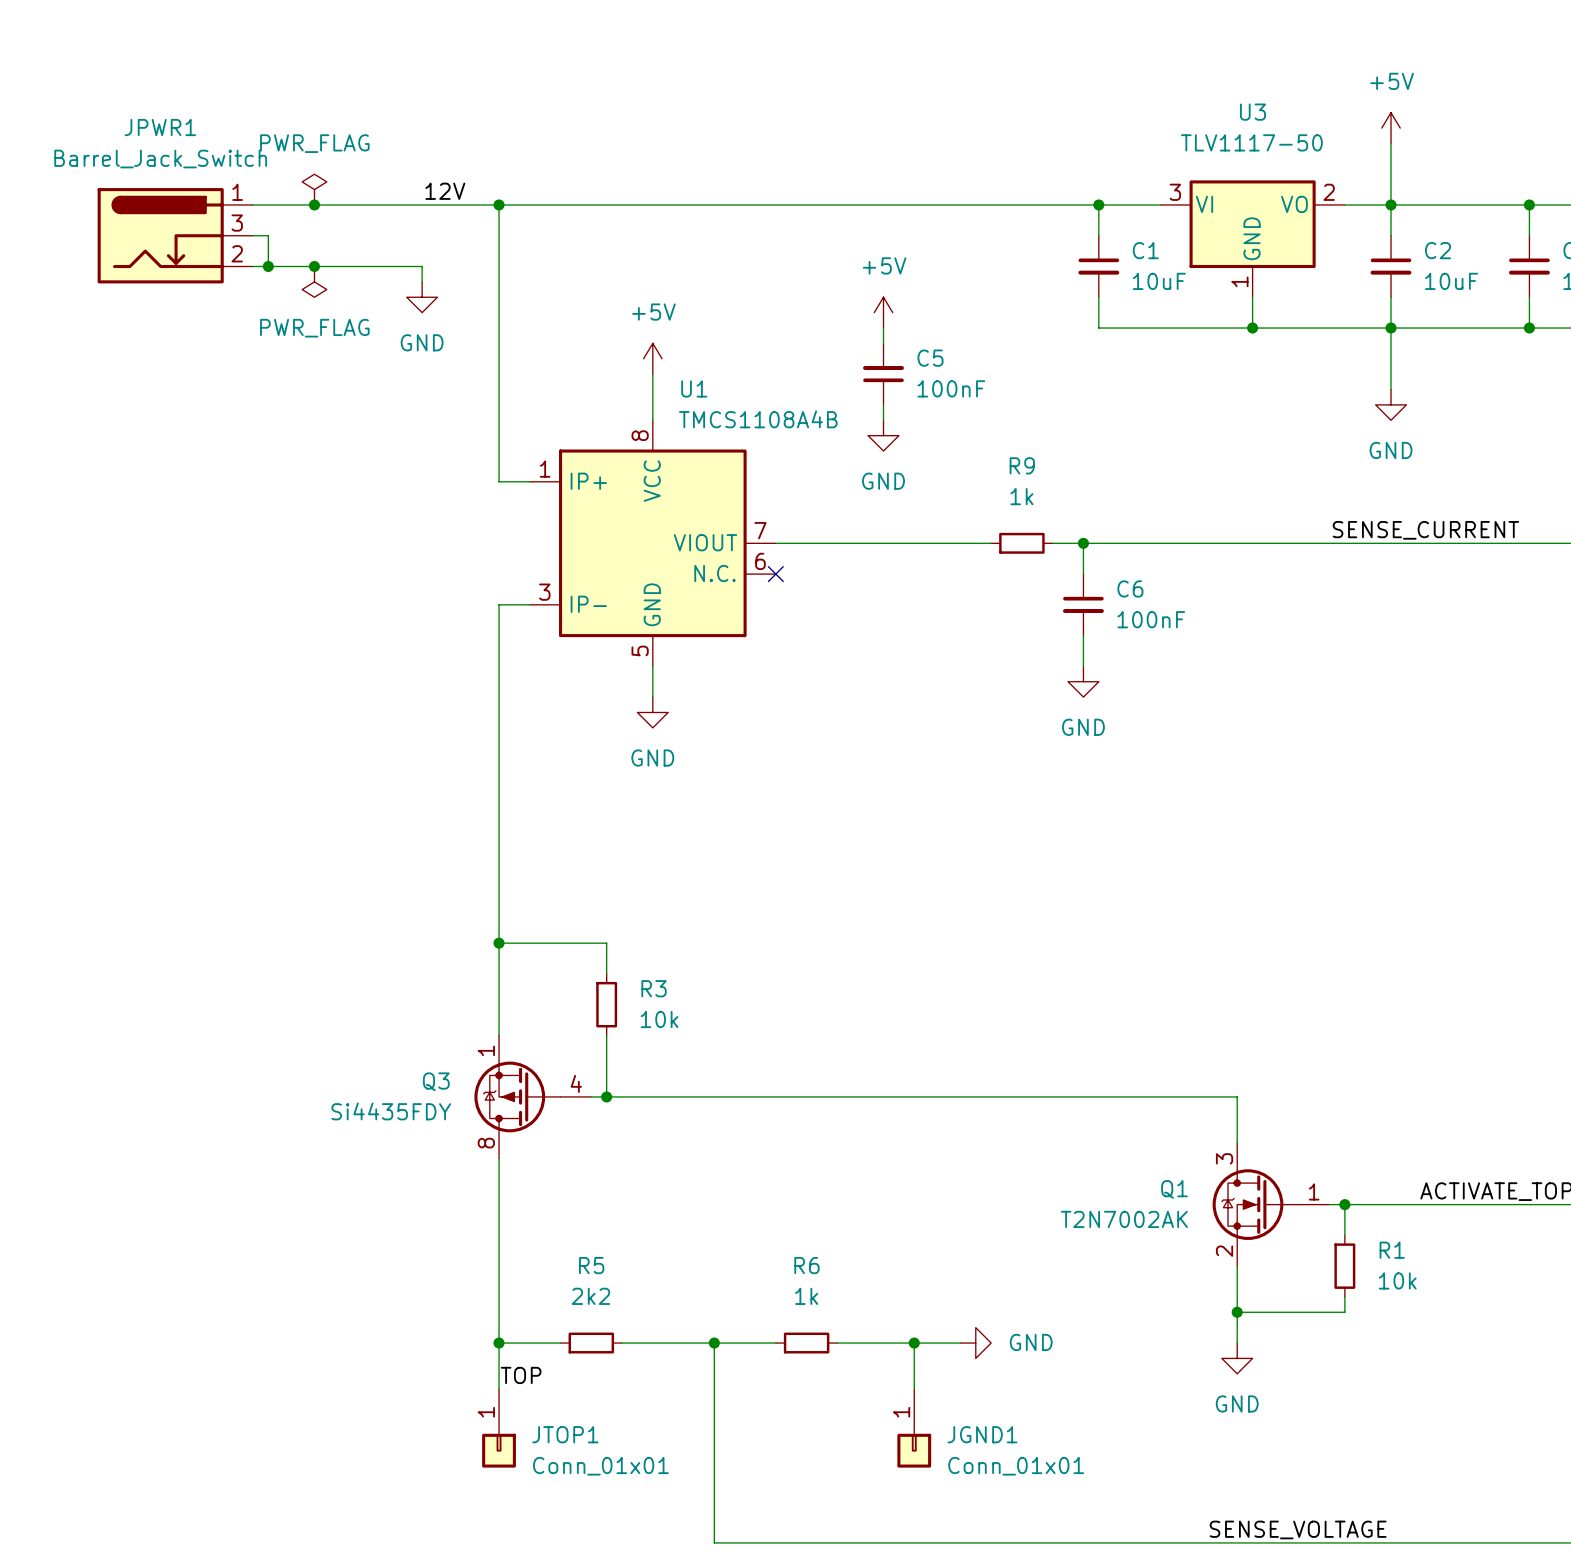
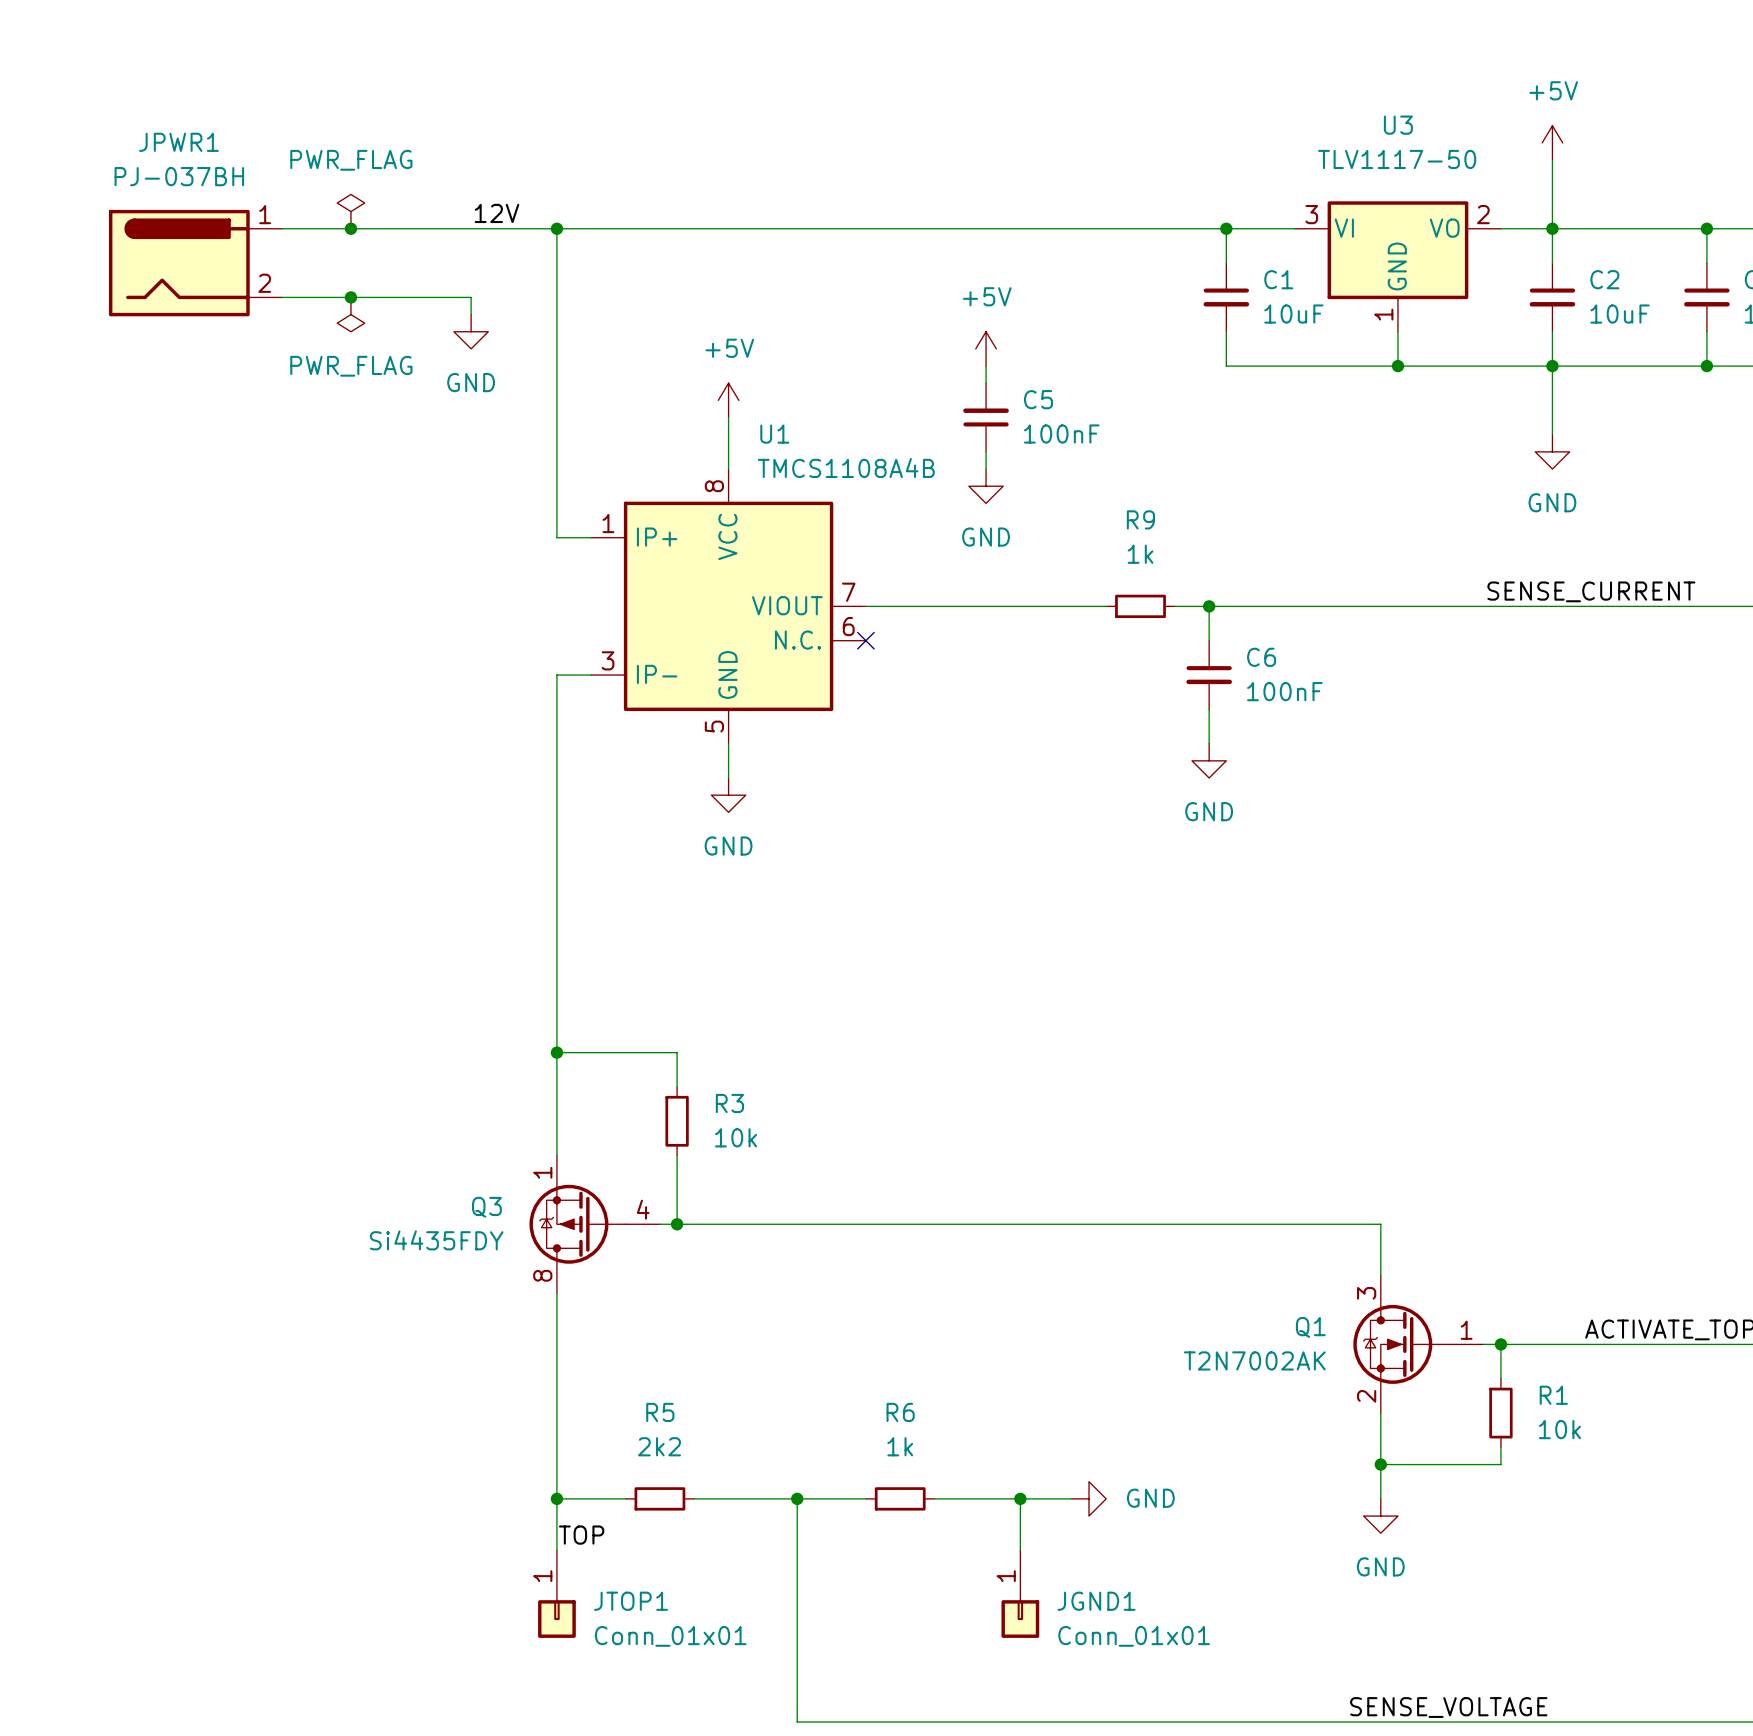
JPWR1 value: Barrel_Jack_Switch (160, 159) -> PJ-037BH (179, 176)
JPWR1 symbol: [97, 188, 253, 284] -> [108, 209, 283, 317]
wire: (252, 235) (268, 235) (268, 266) -> none
junction: (268, 266) -> none

